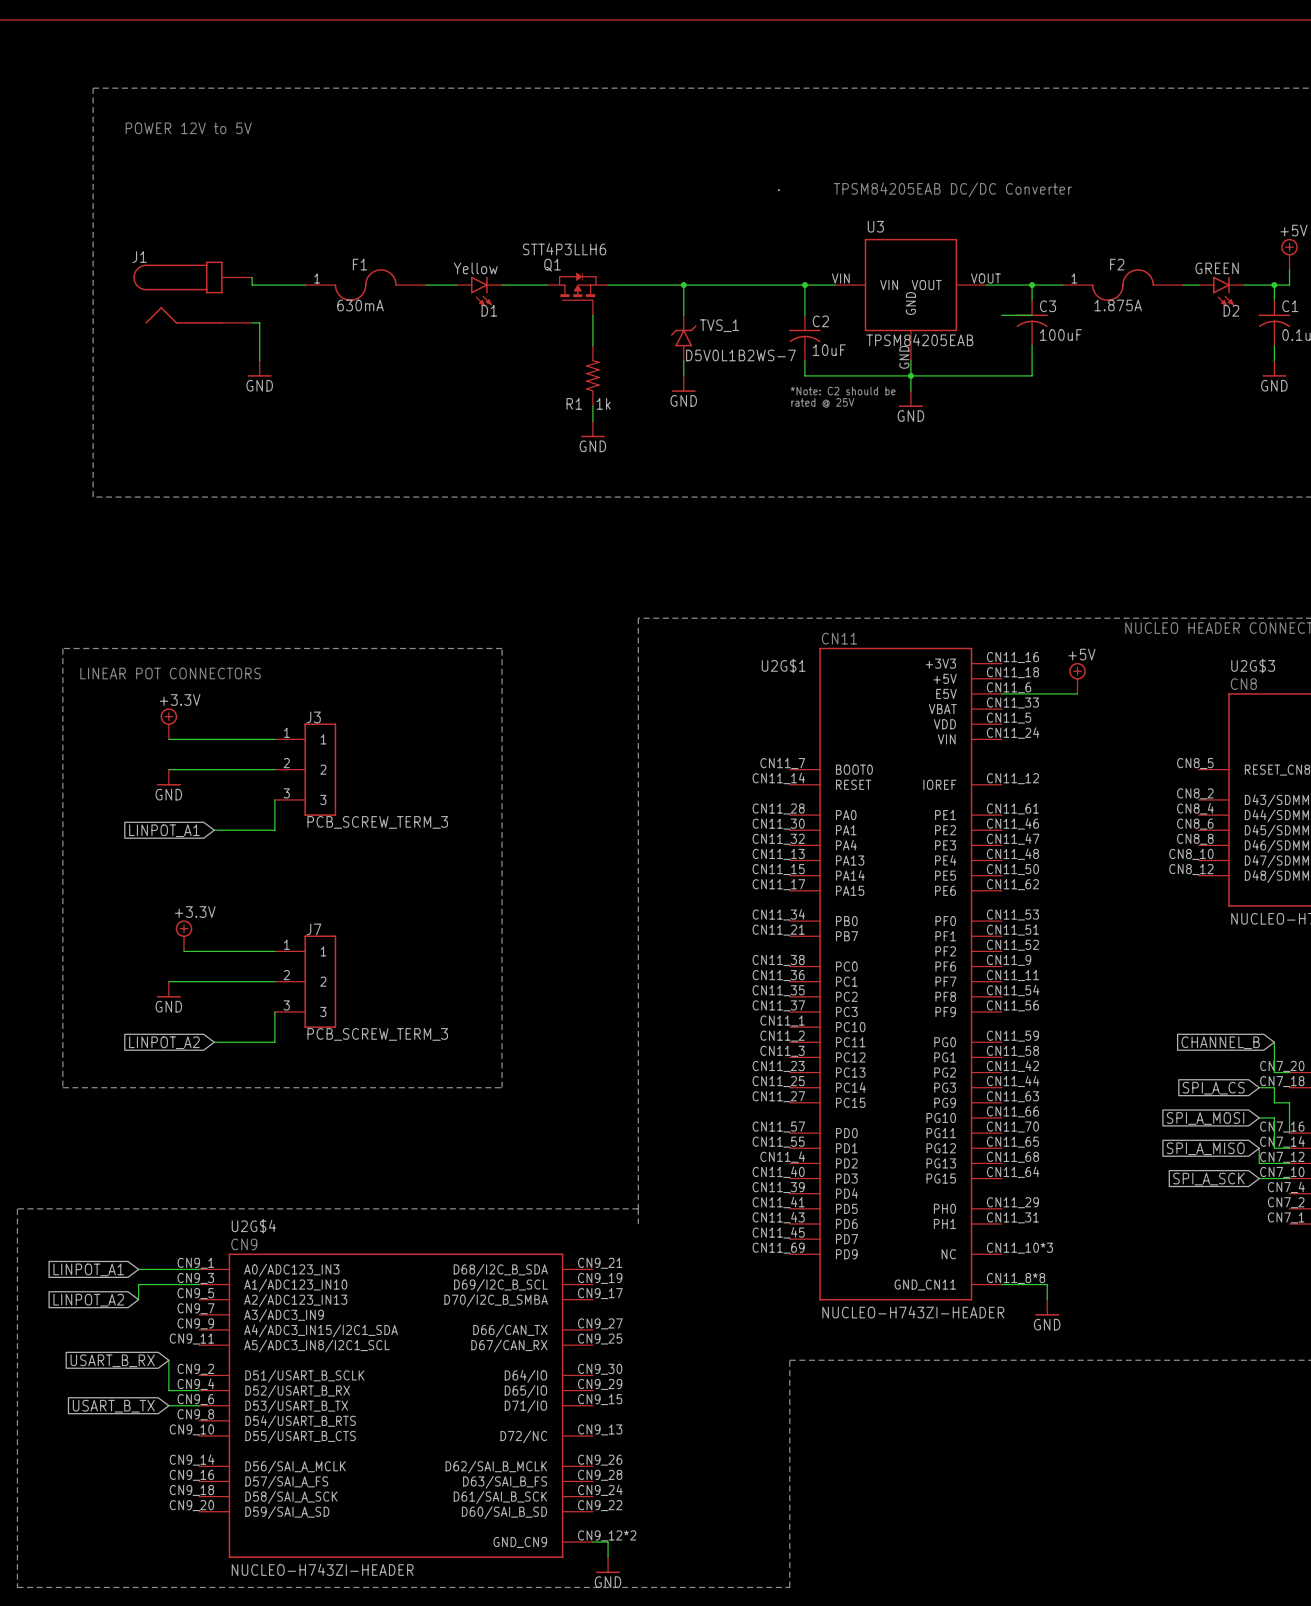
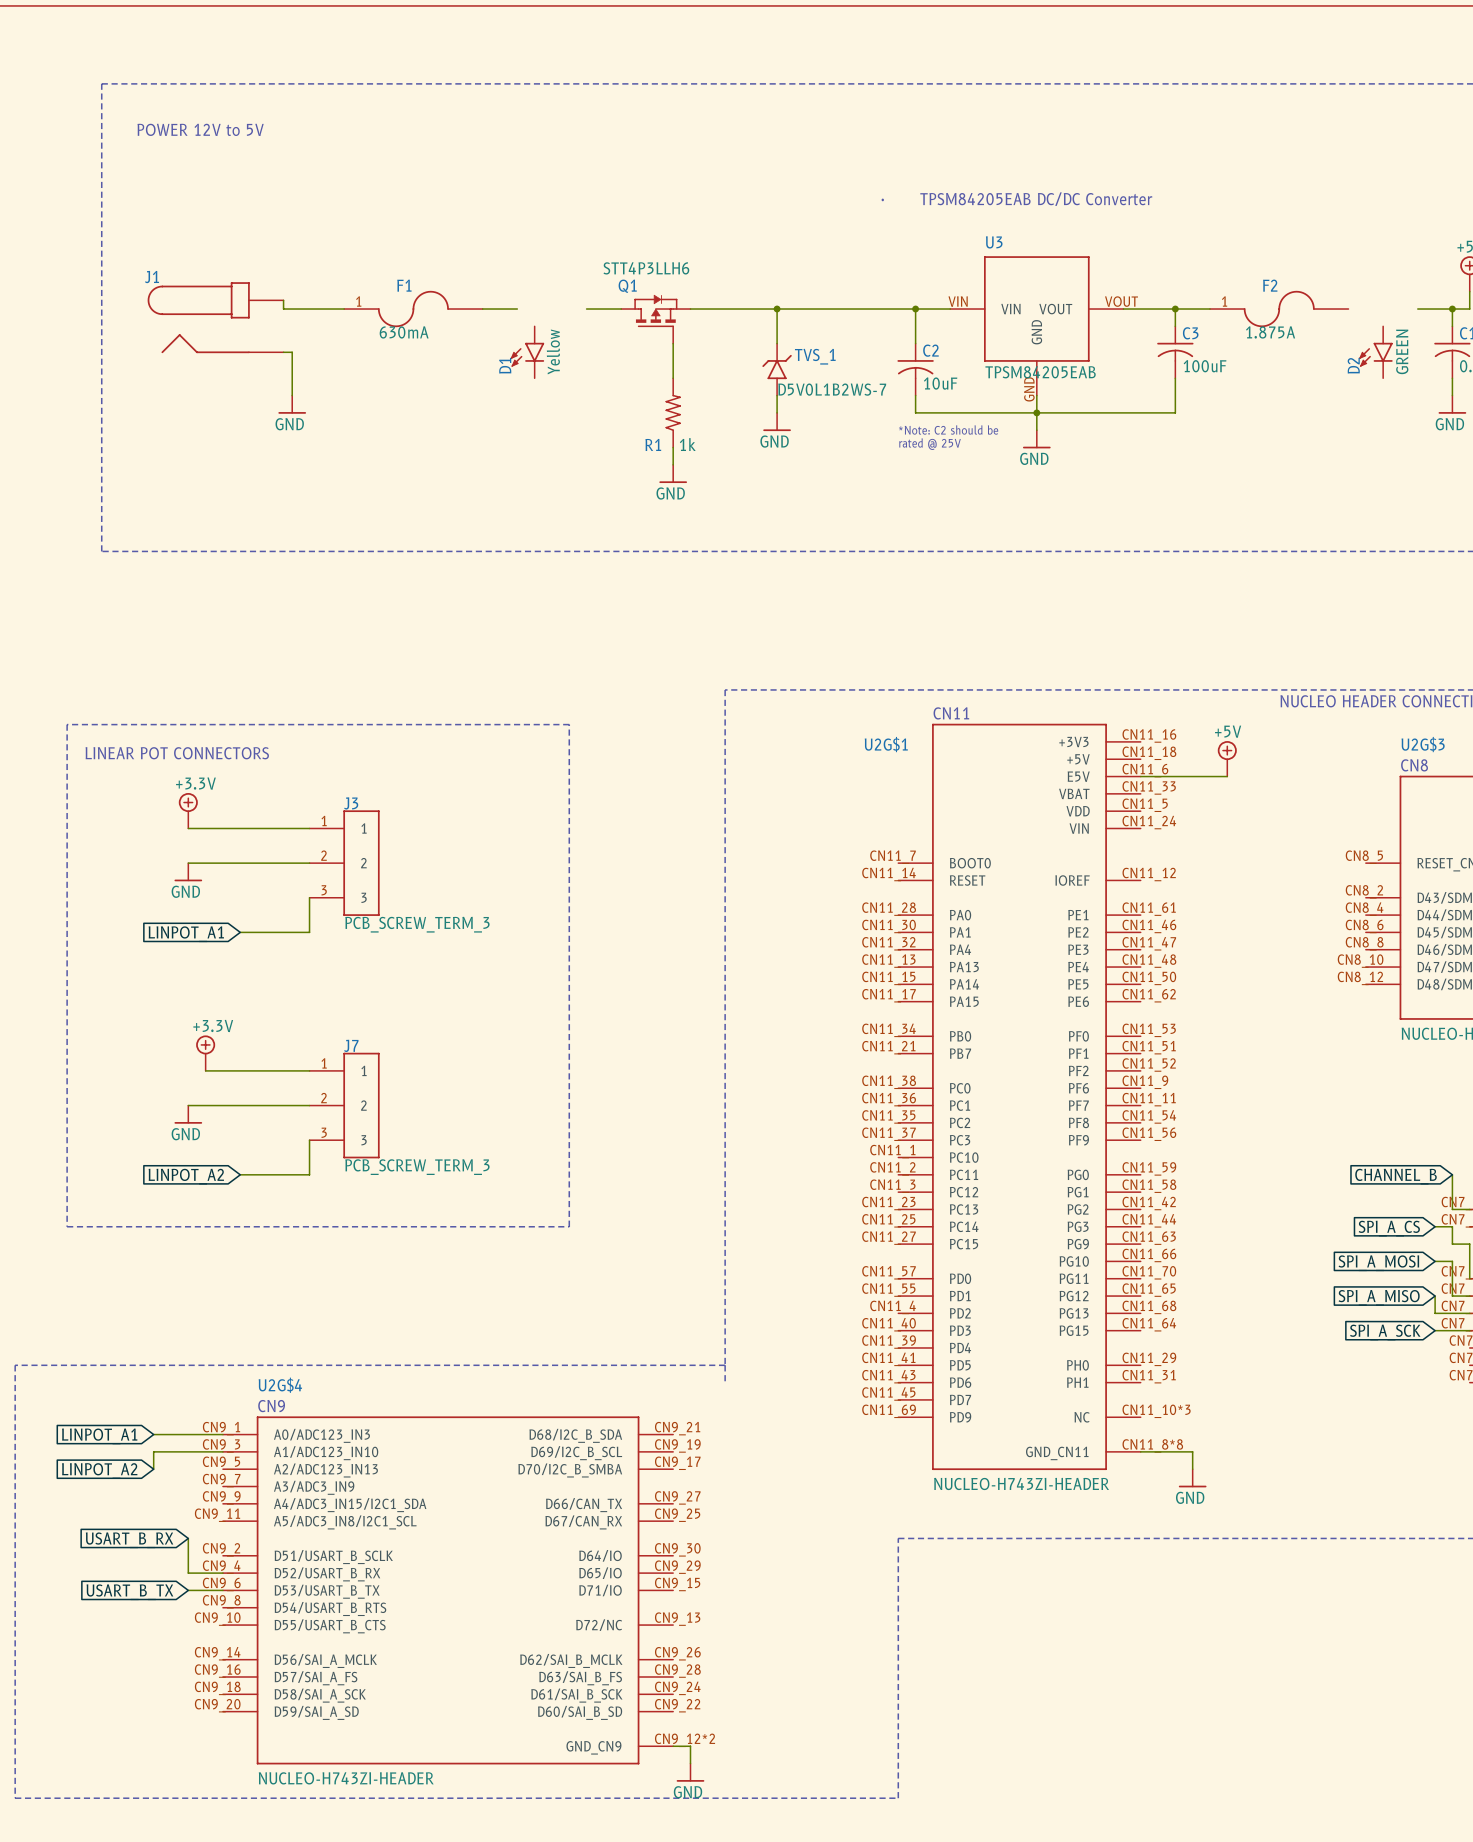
wire: (502, 285) (517, 285) -> none
wire: (1183, 285) (1198, 285) -> none
D1 position: (479, 291) -> (527, 352)
D1 rotation: 0° (481, 291) -> 90° clockwise (527, 354)
D2 position: (1221, 291) -> (1375, 352)
D2 rotation: 0° (1223, 291) -> 90° clockwise (1375, 354)
wire: (1001, 315) (1032, 315) -> none

